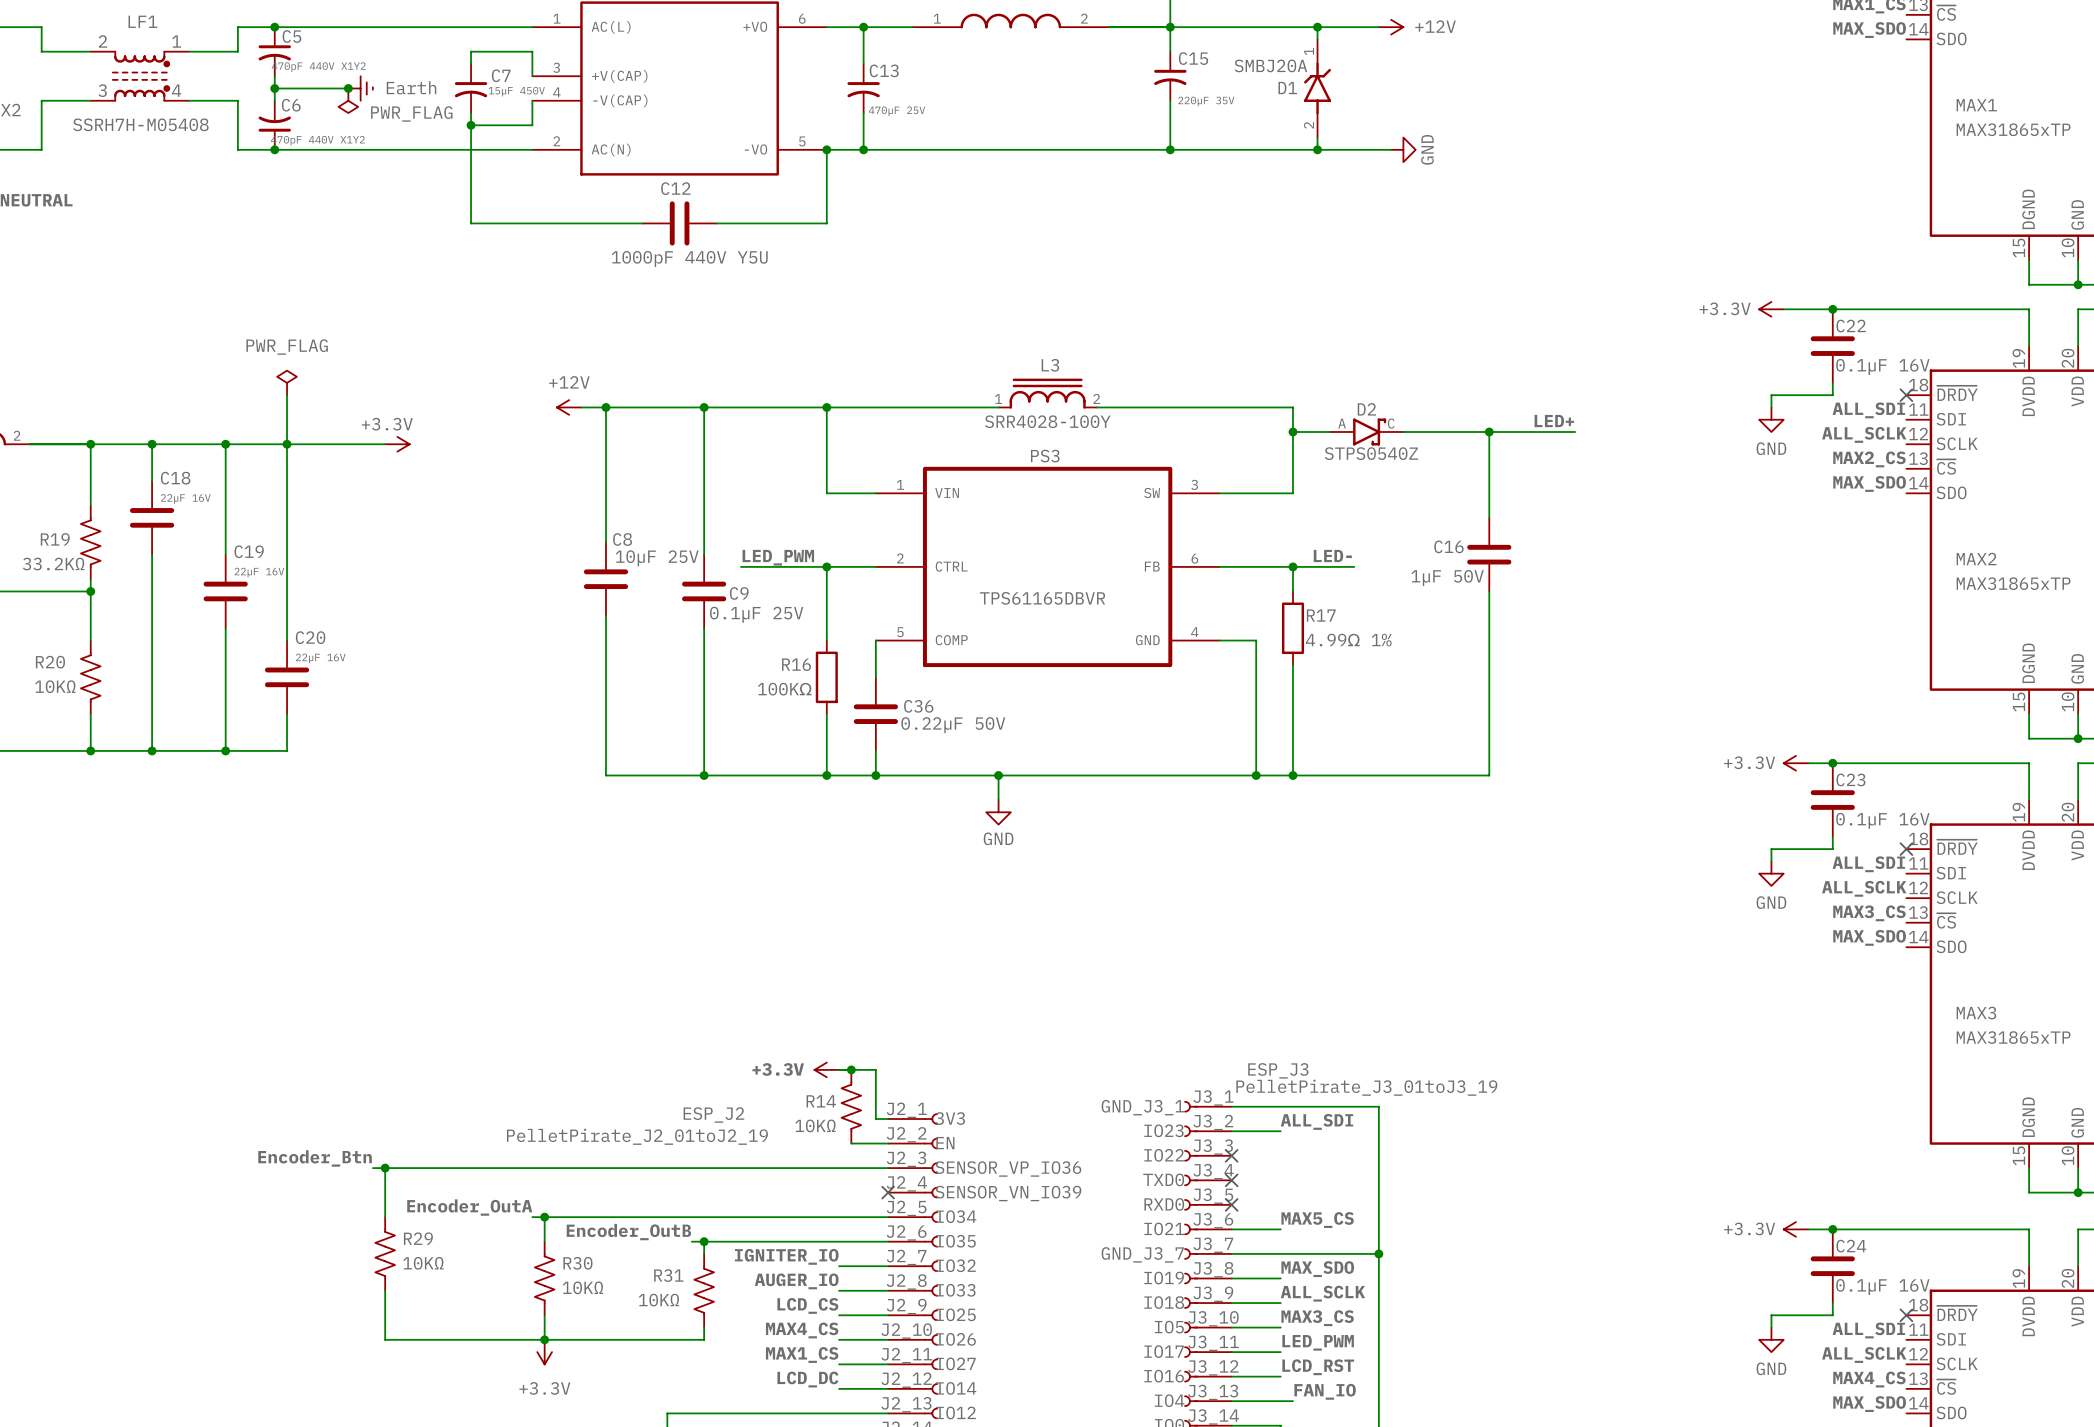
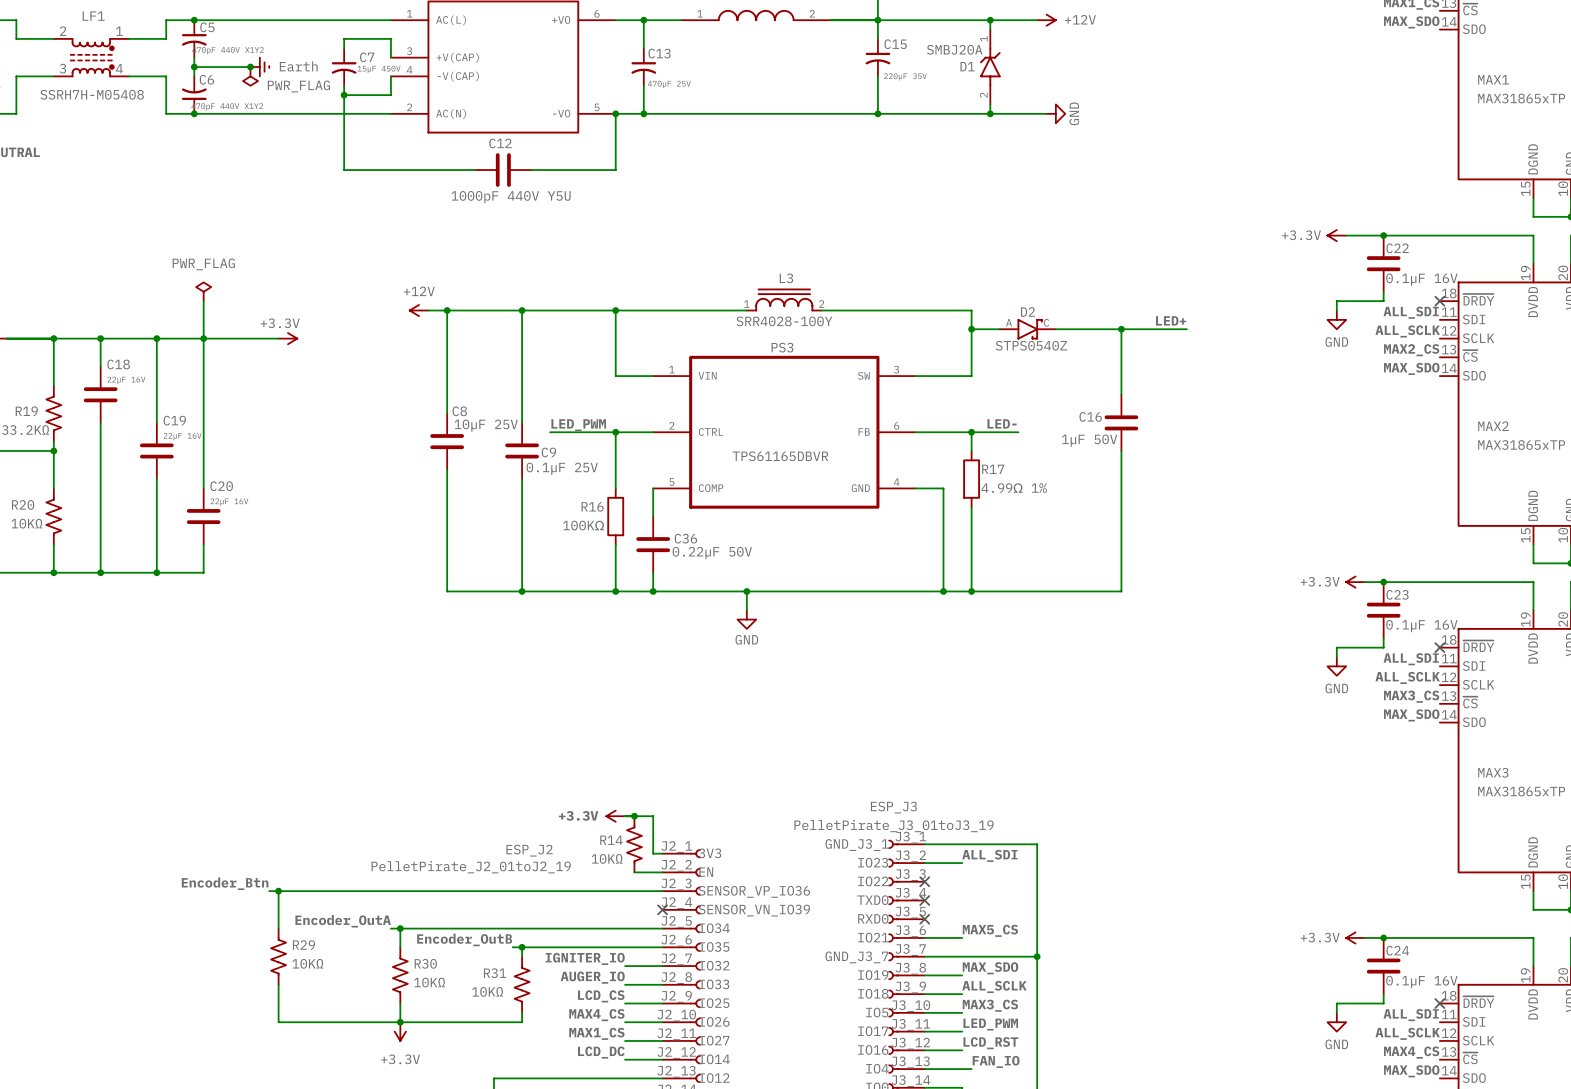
ESP_J3 name position: ESP_J3 (1278, 1070) -> ESP_J3 (893, 807)
ESP_J3 value position: PelletPirate_J3_01toJ3_19 (1366, 1087) -> PelletPirate_J3_01toJ3_19 (894, 826)

